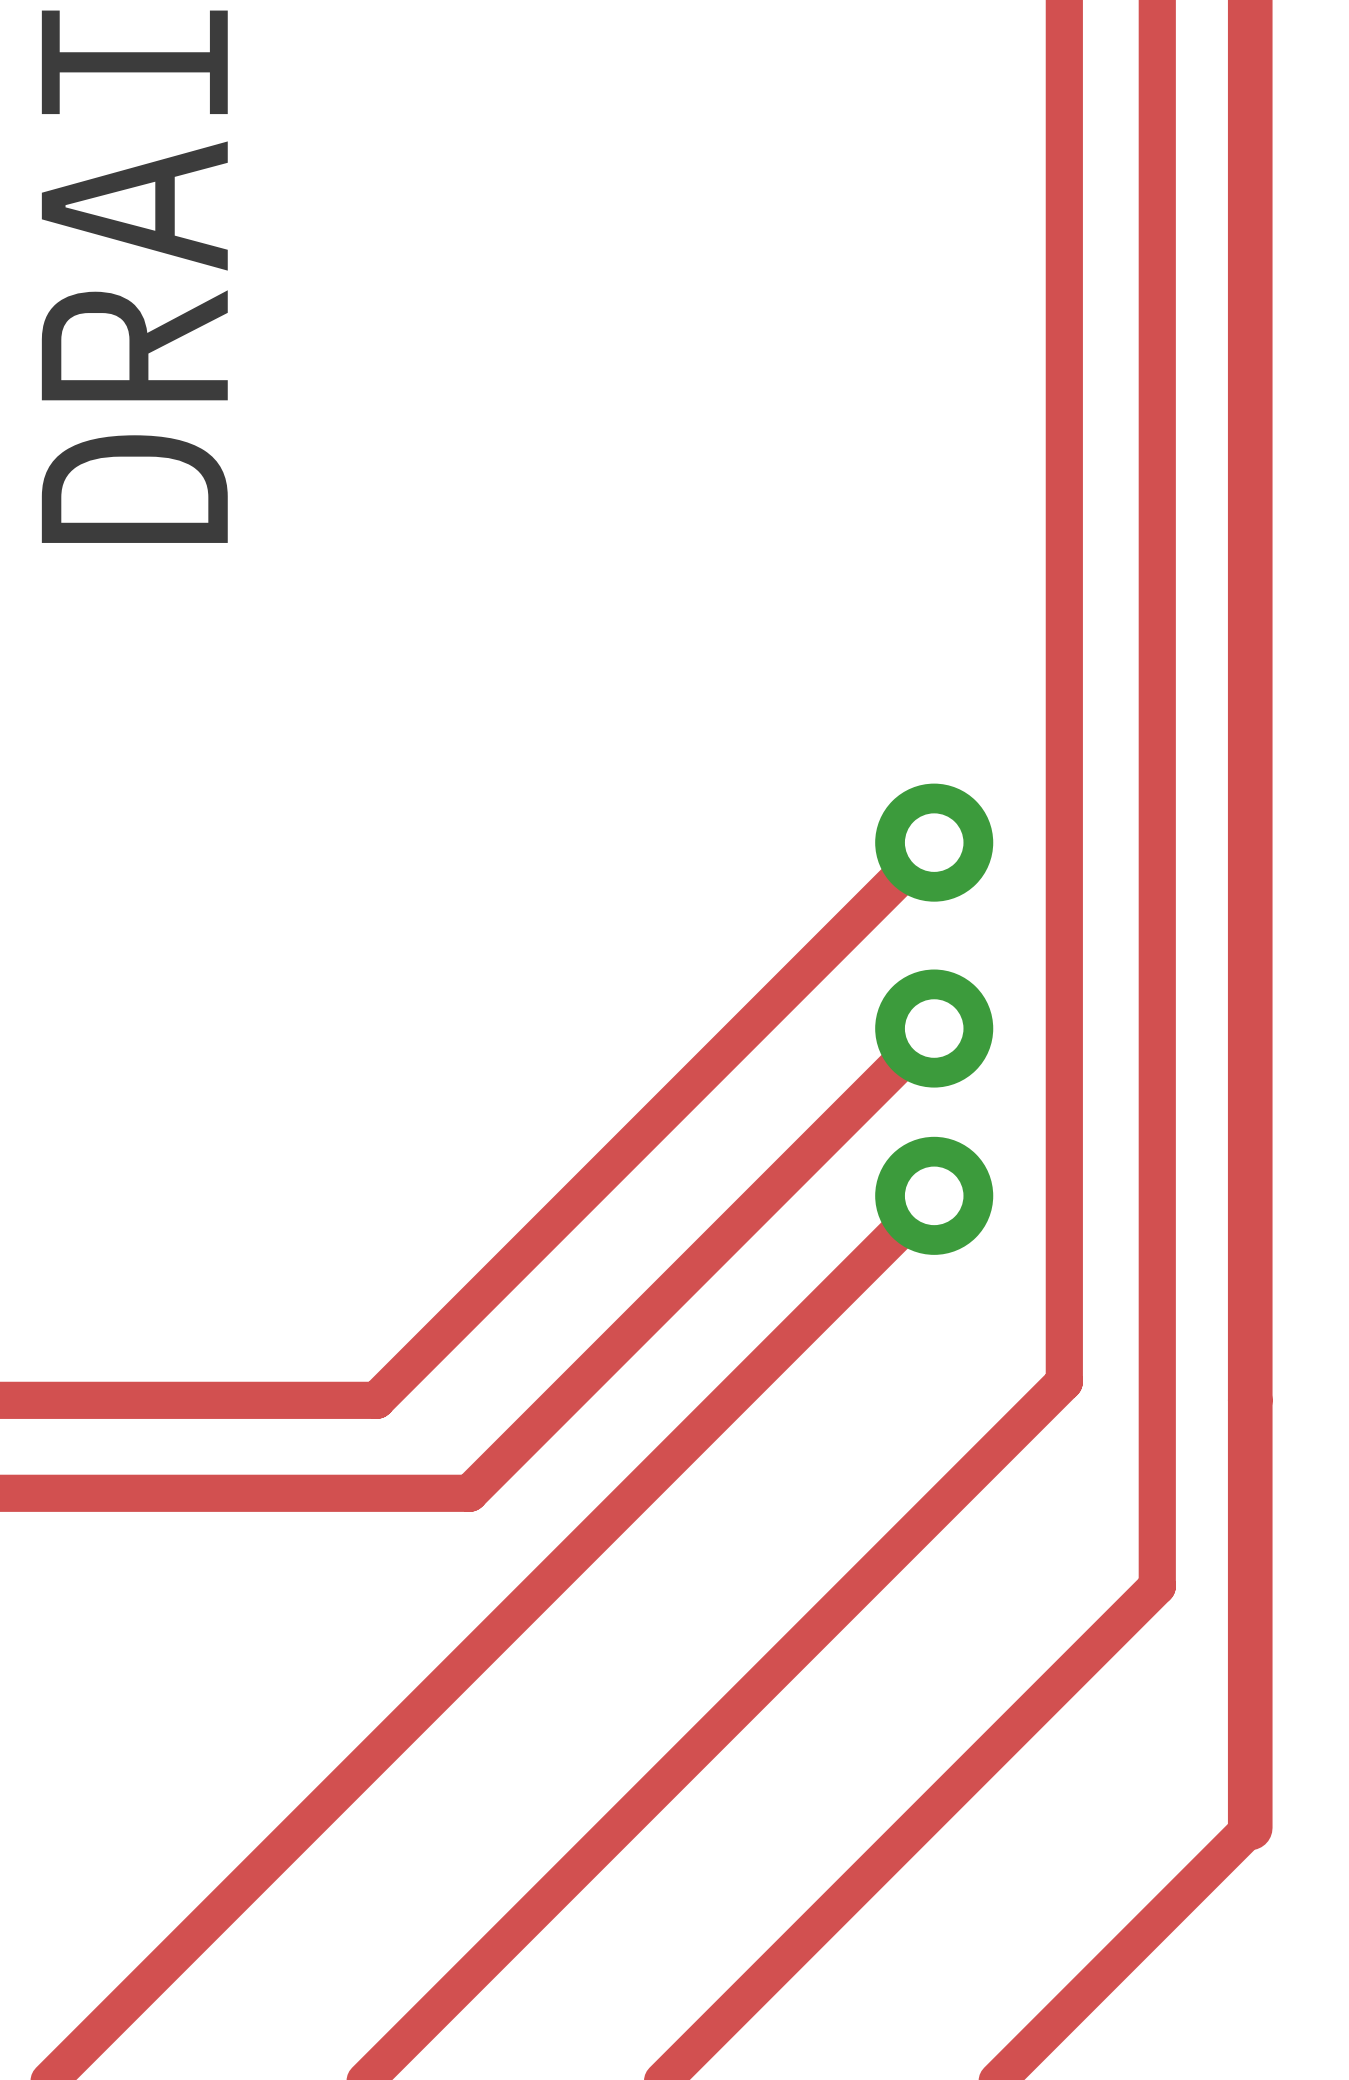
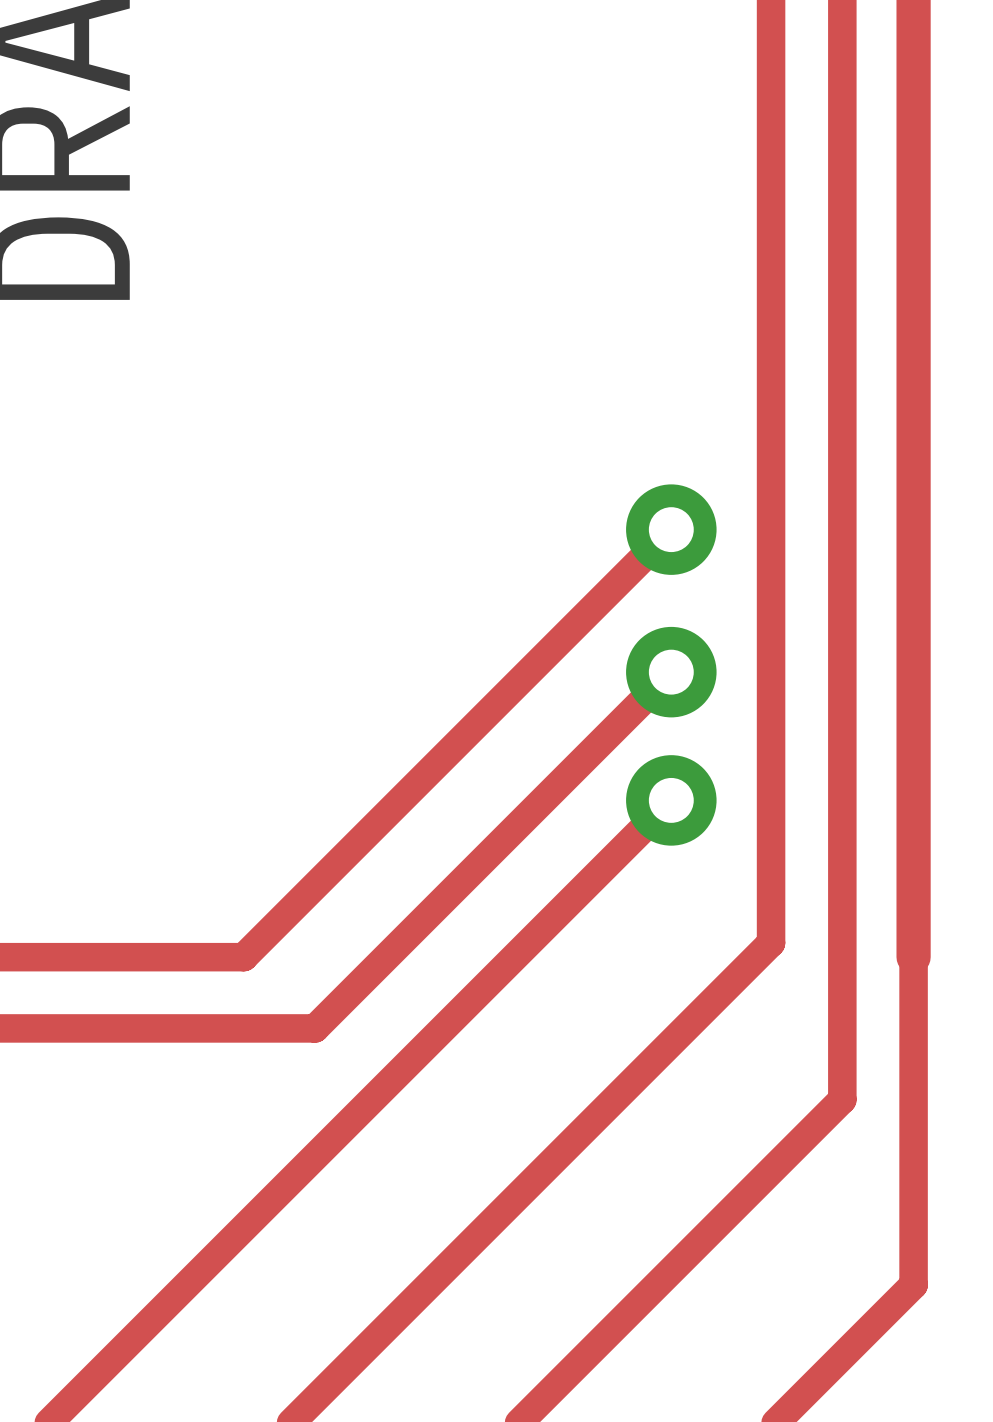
track width: thick (1250, 1400) (1250, 1827) -> thin (913, 957) (913, 1284)

